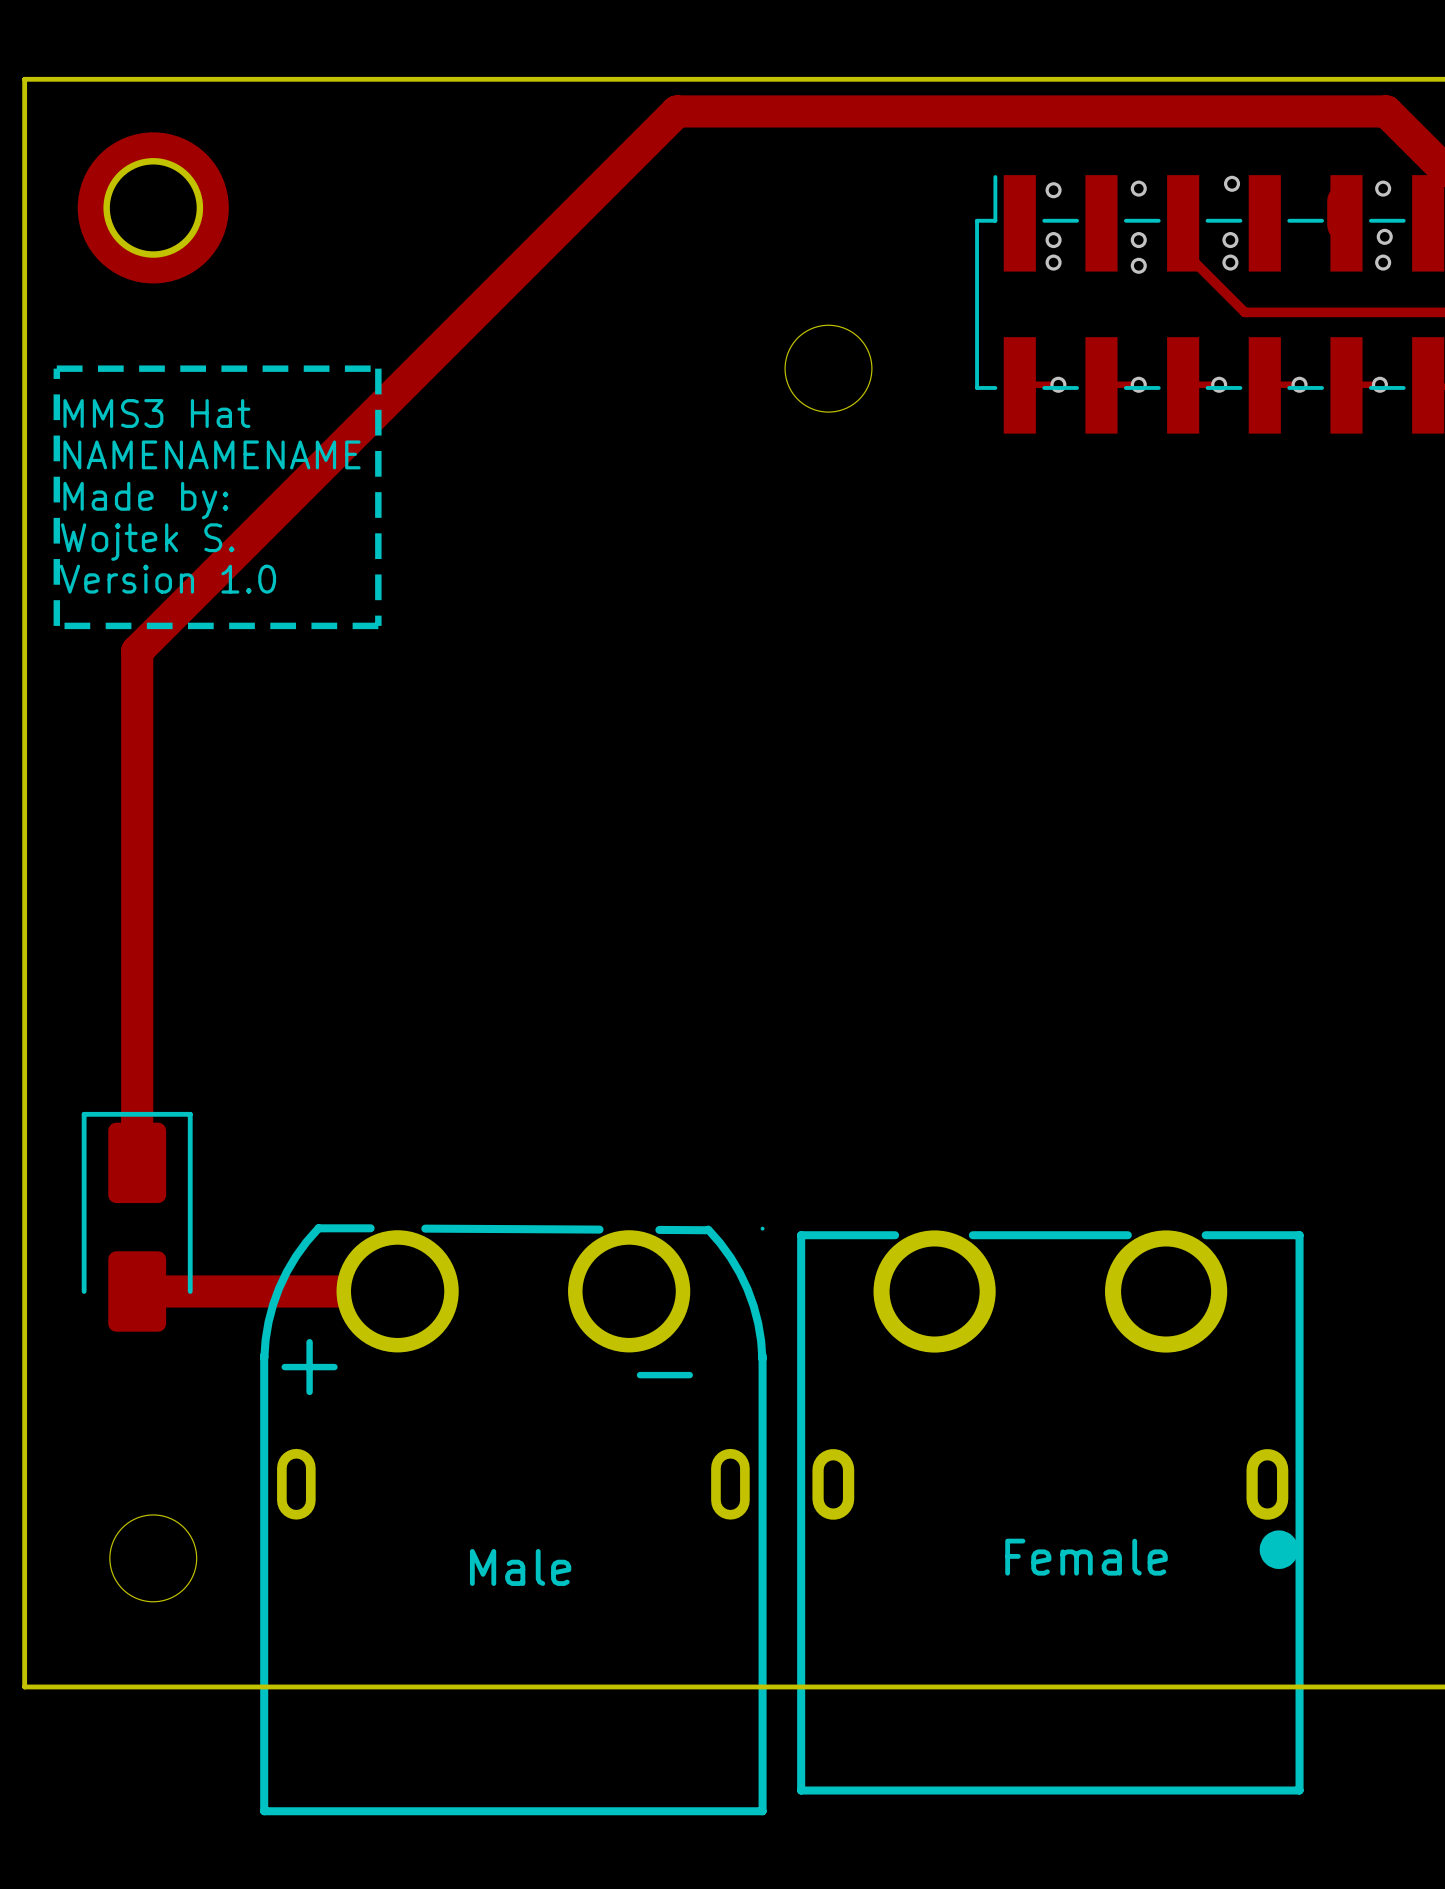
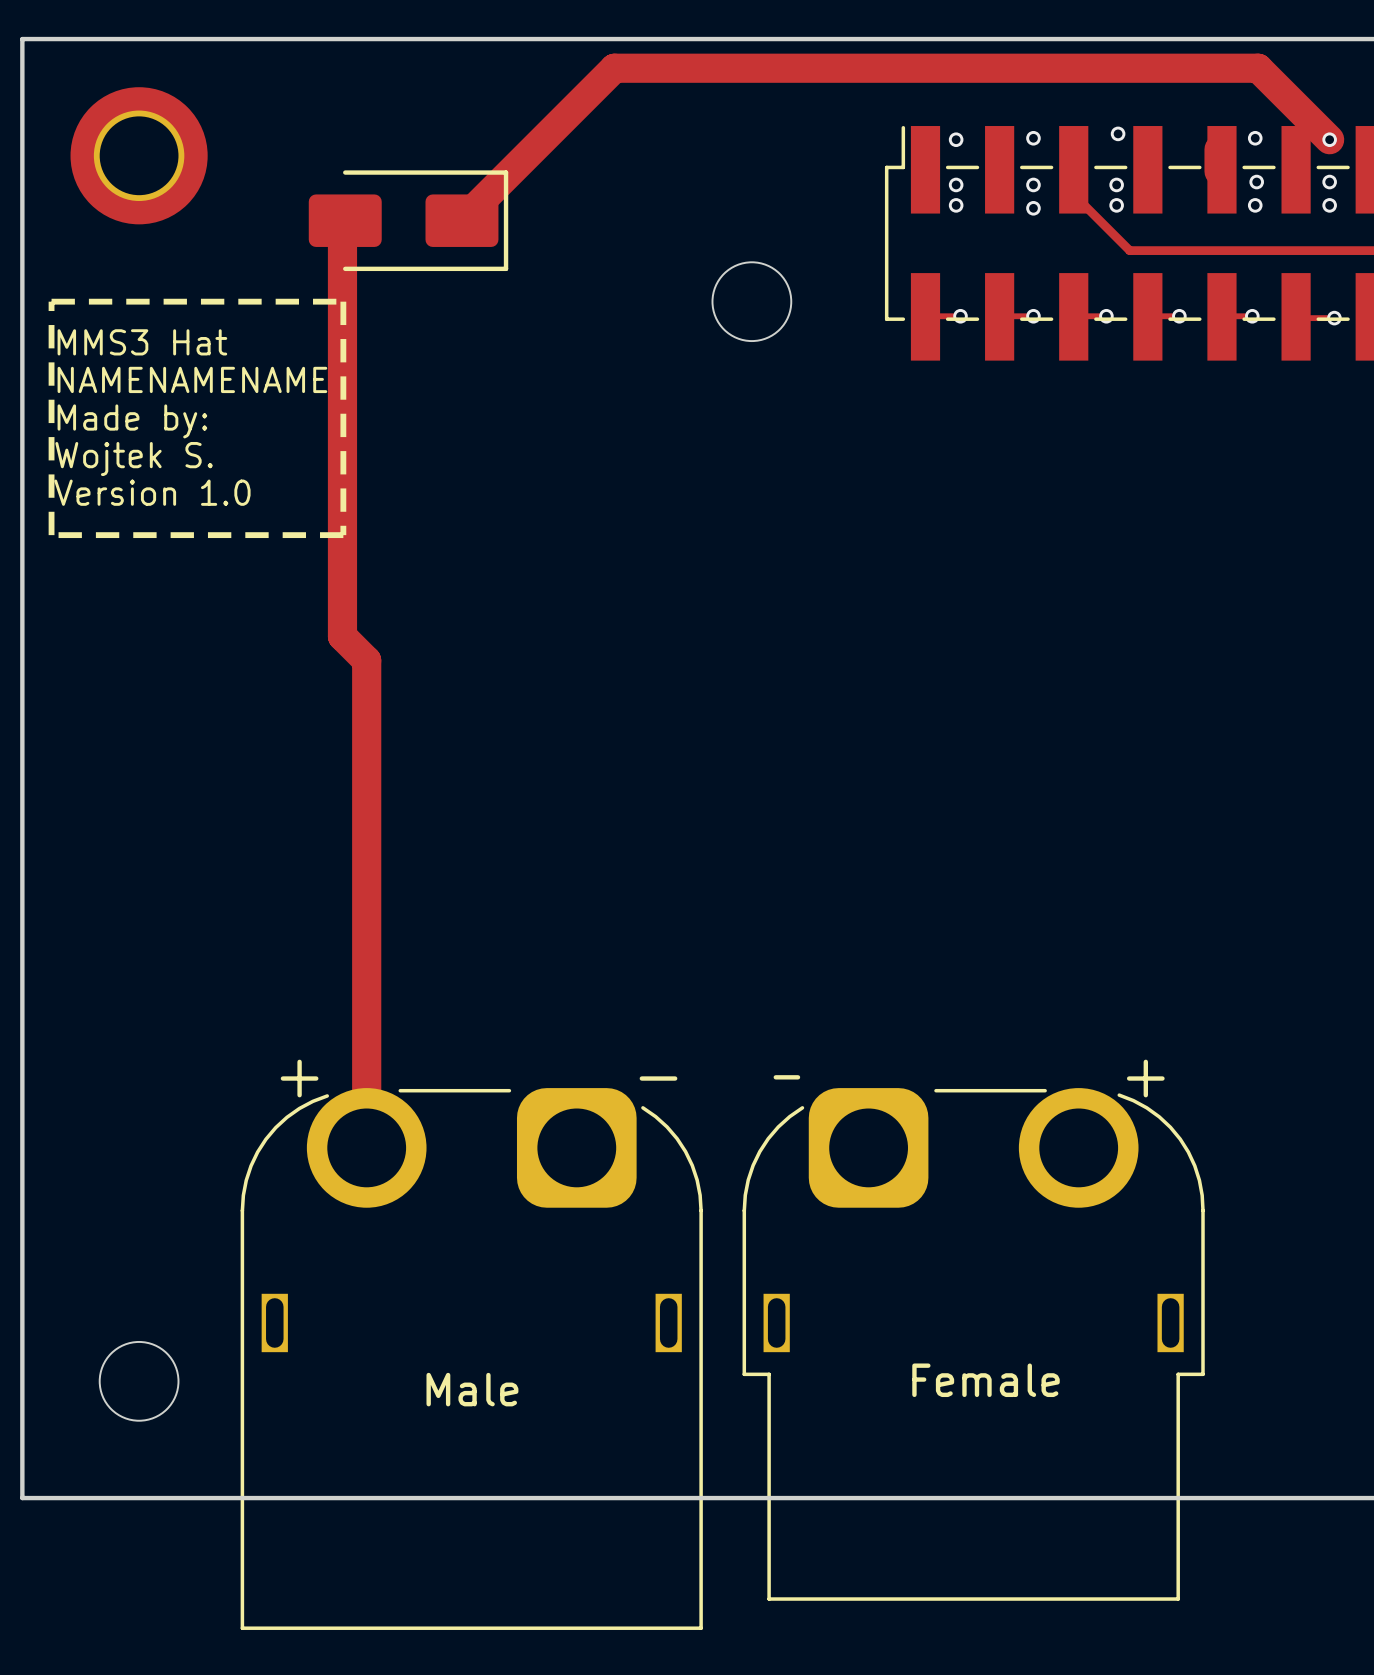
track: none -> (342, 211) (342, 636) (366, 660) (366, 1147) (379, 1146)
part: none -> (408, 220)
track: (509, 279) (137, 651) (137, 1162) -> none
part: (137, 1221) -> none
part footprint: [260, 1224, 767, 1816] -> [240, 1088, 703, 1630]
part footprint: [797, 1230, 1304, 1795] -> [742, 1088, 1205, 1601]
track: (137, 1291) (397, 1291) -> none

